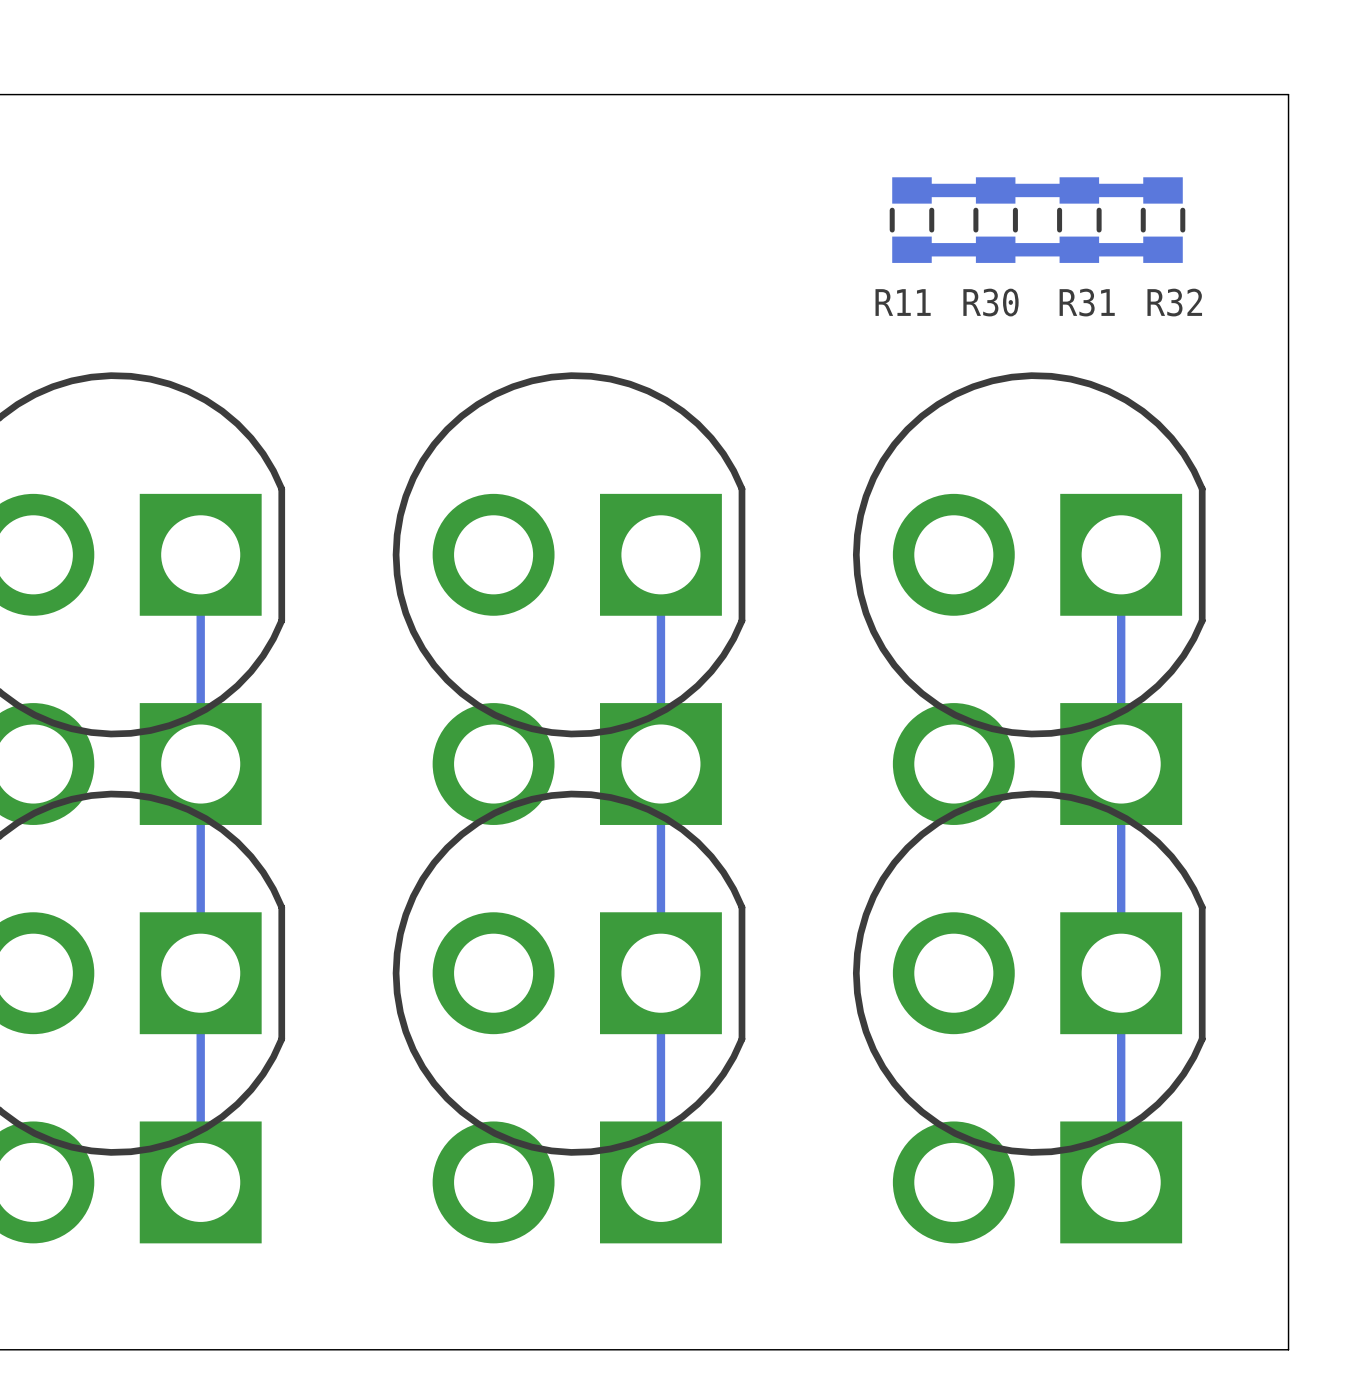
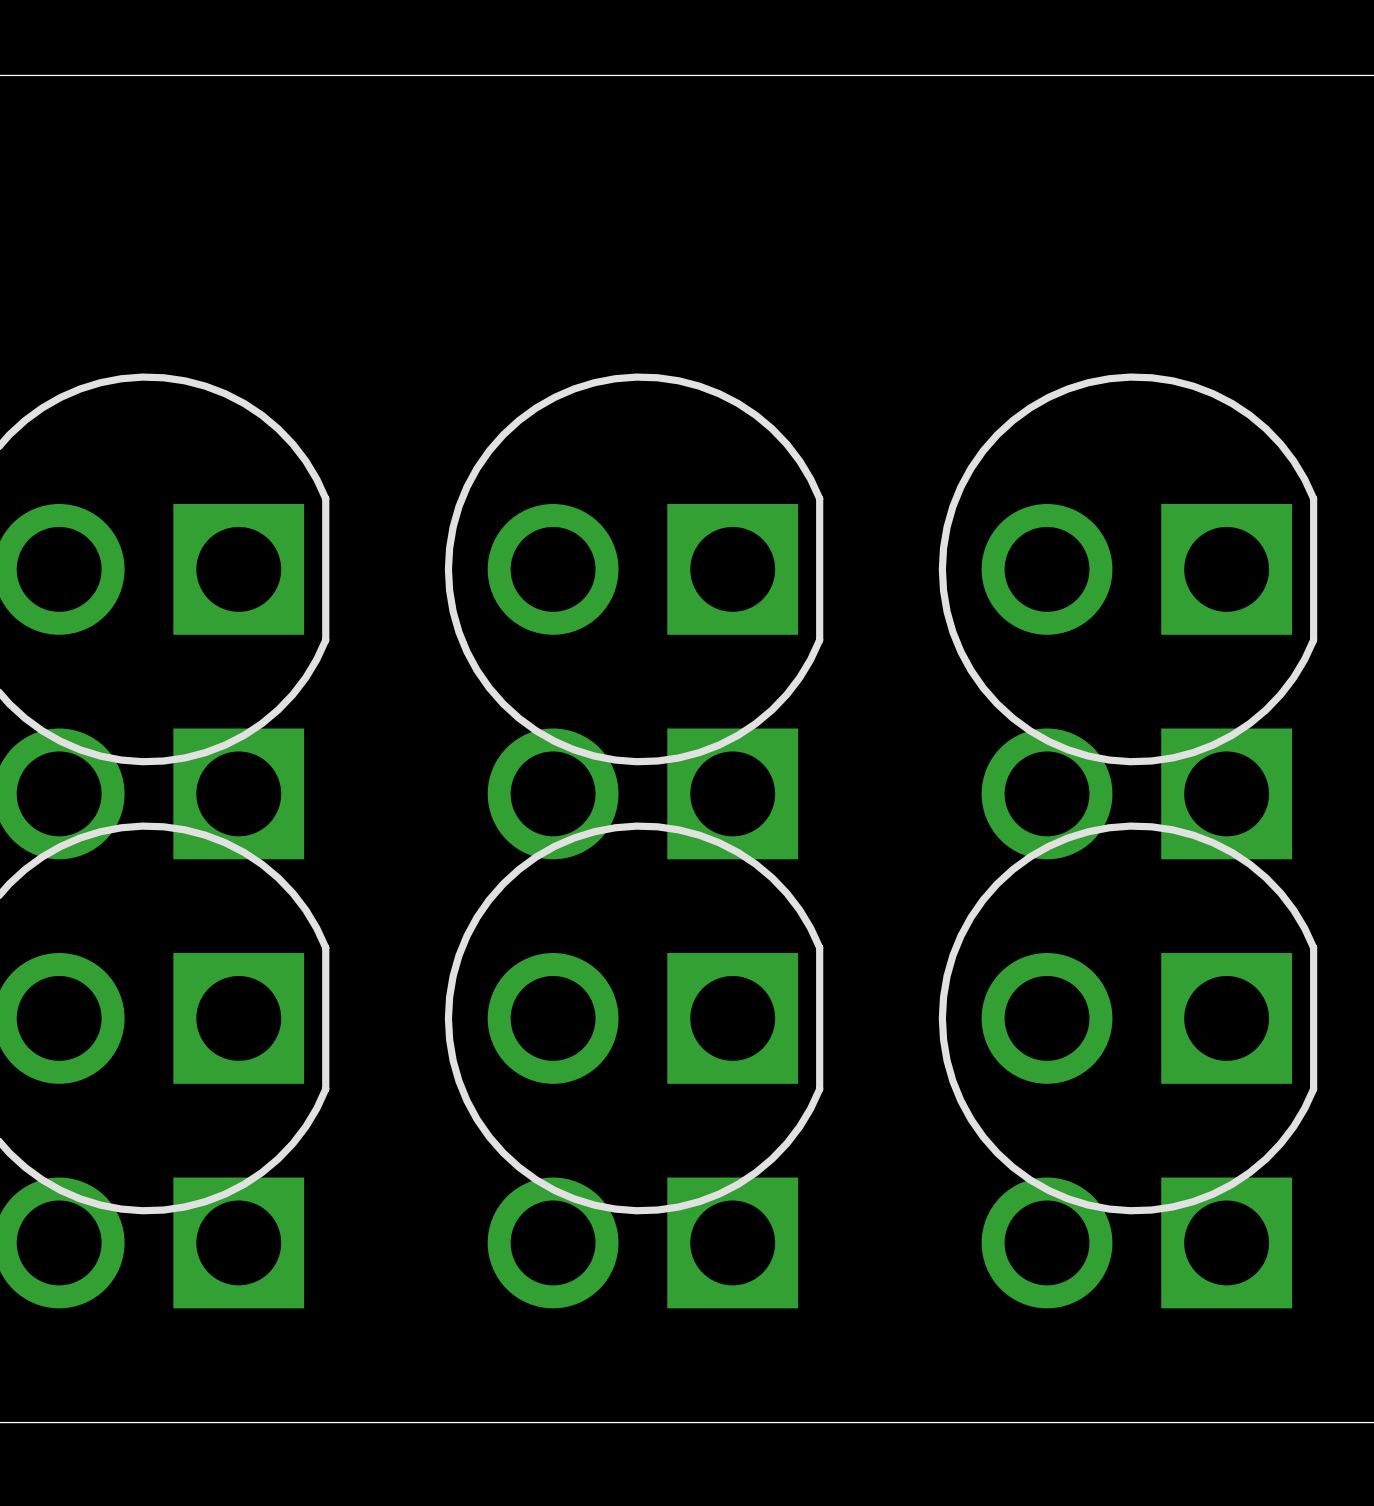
track: (1163, 190) (911, 190) -> none
R11: (911, 220) -> none
R30: (995, 220) -> none
R31: (1079, 220) -> none
R32: (1163, 220) -> none
track: (1163, 249) (911, 249) -> none
track: (200, 554) (200, 1182) -> none
track: (660, 554) (660, 1182) -> none
track: (1121, 554) (1121, 1182) -> none

